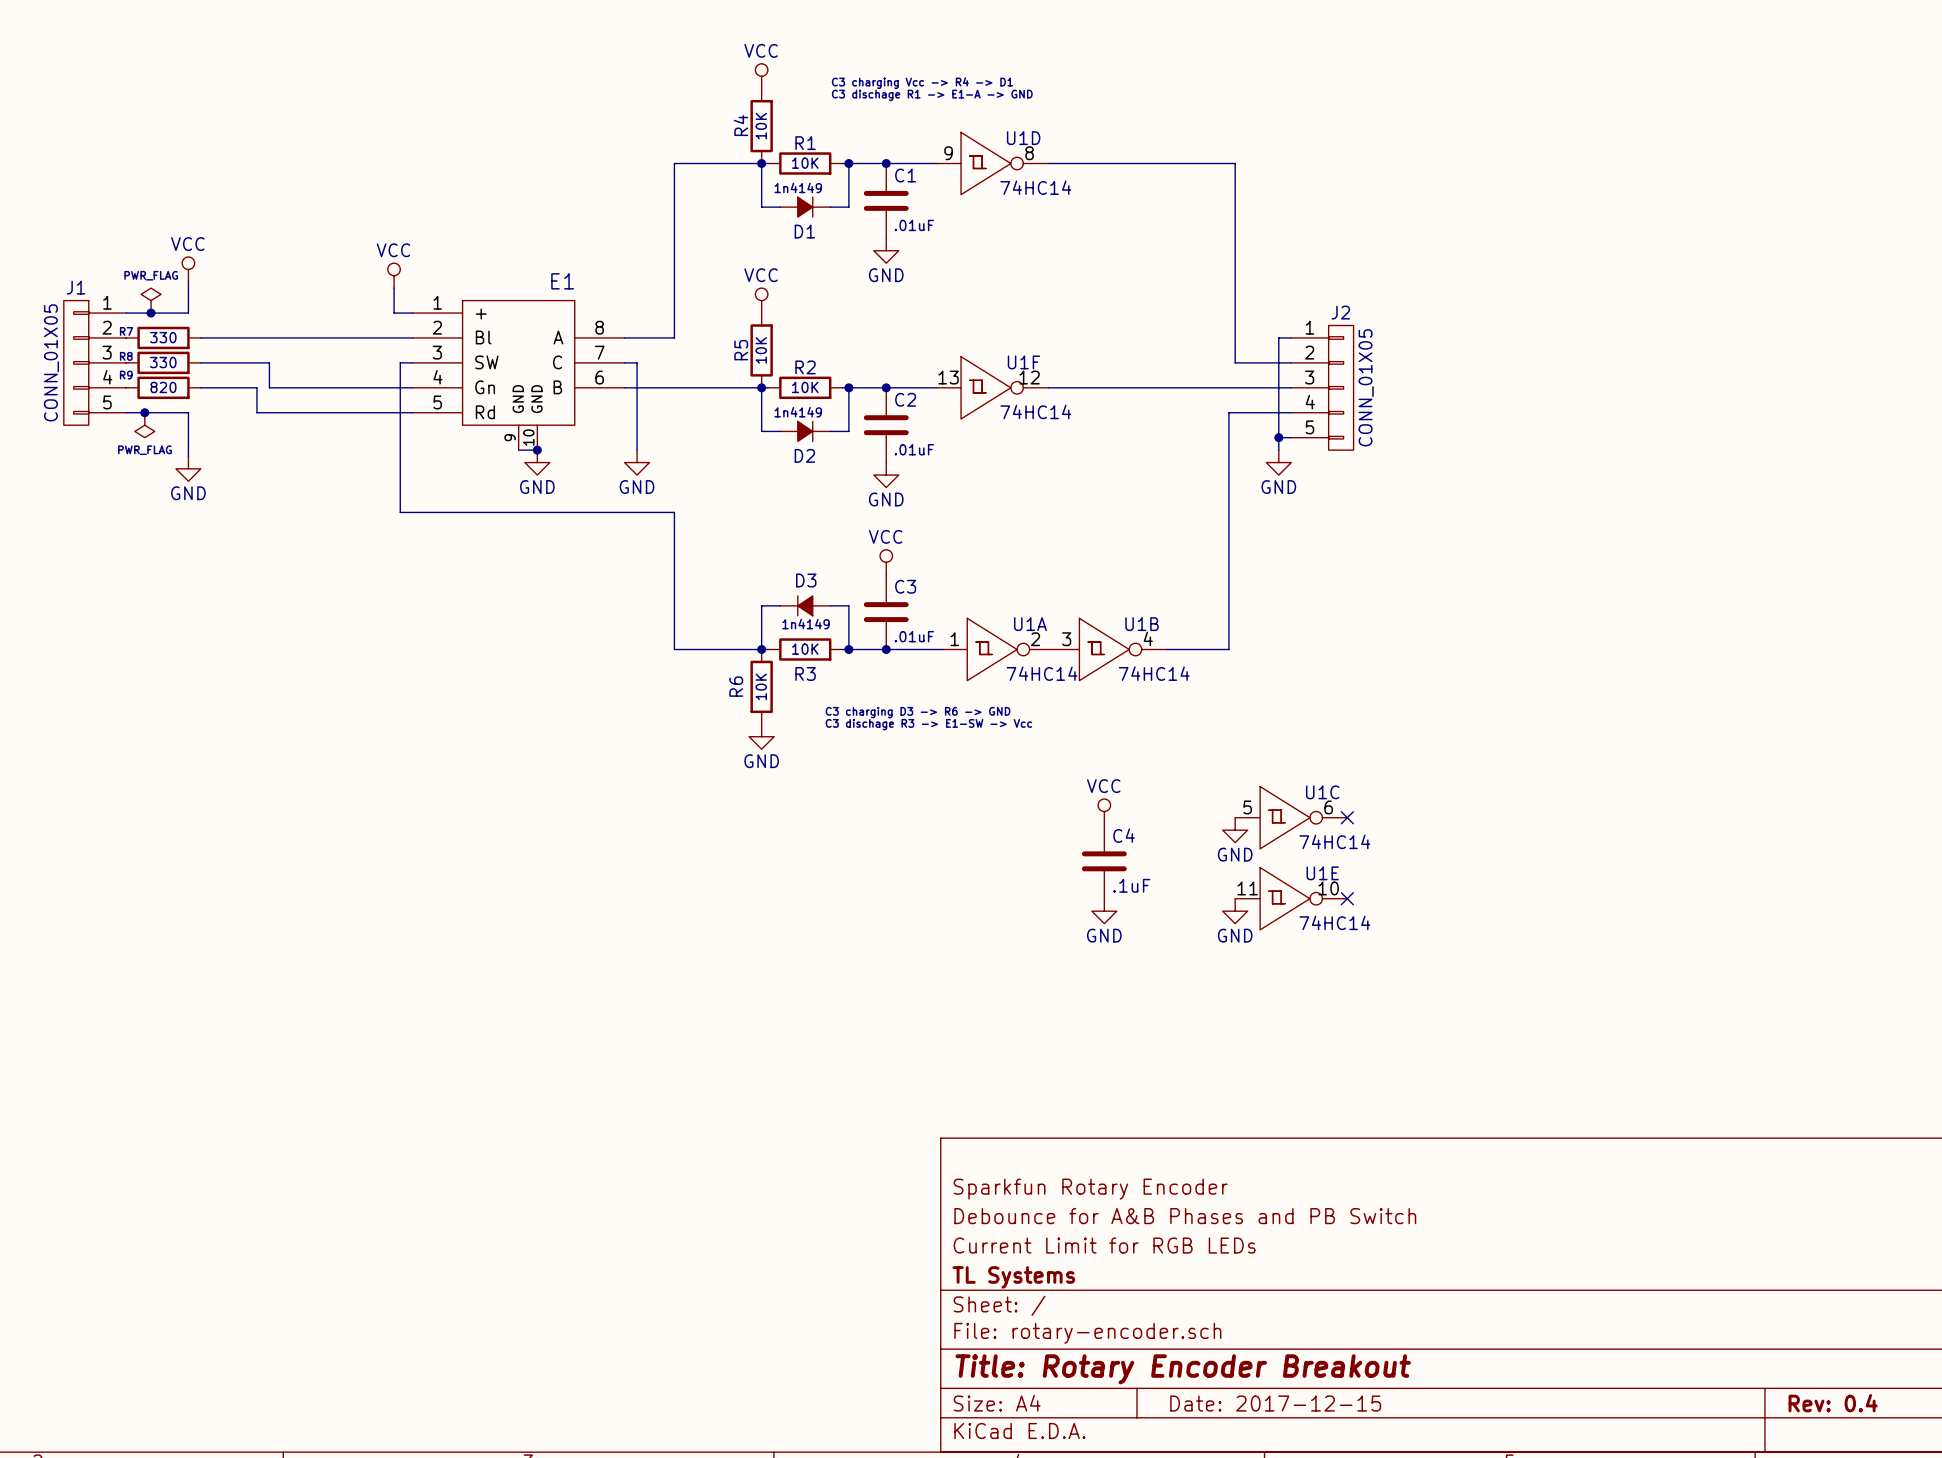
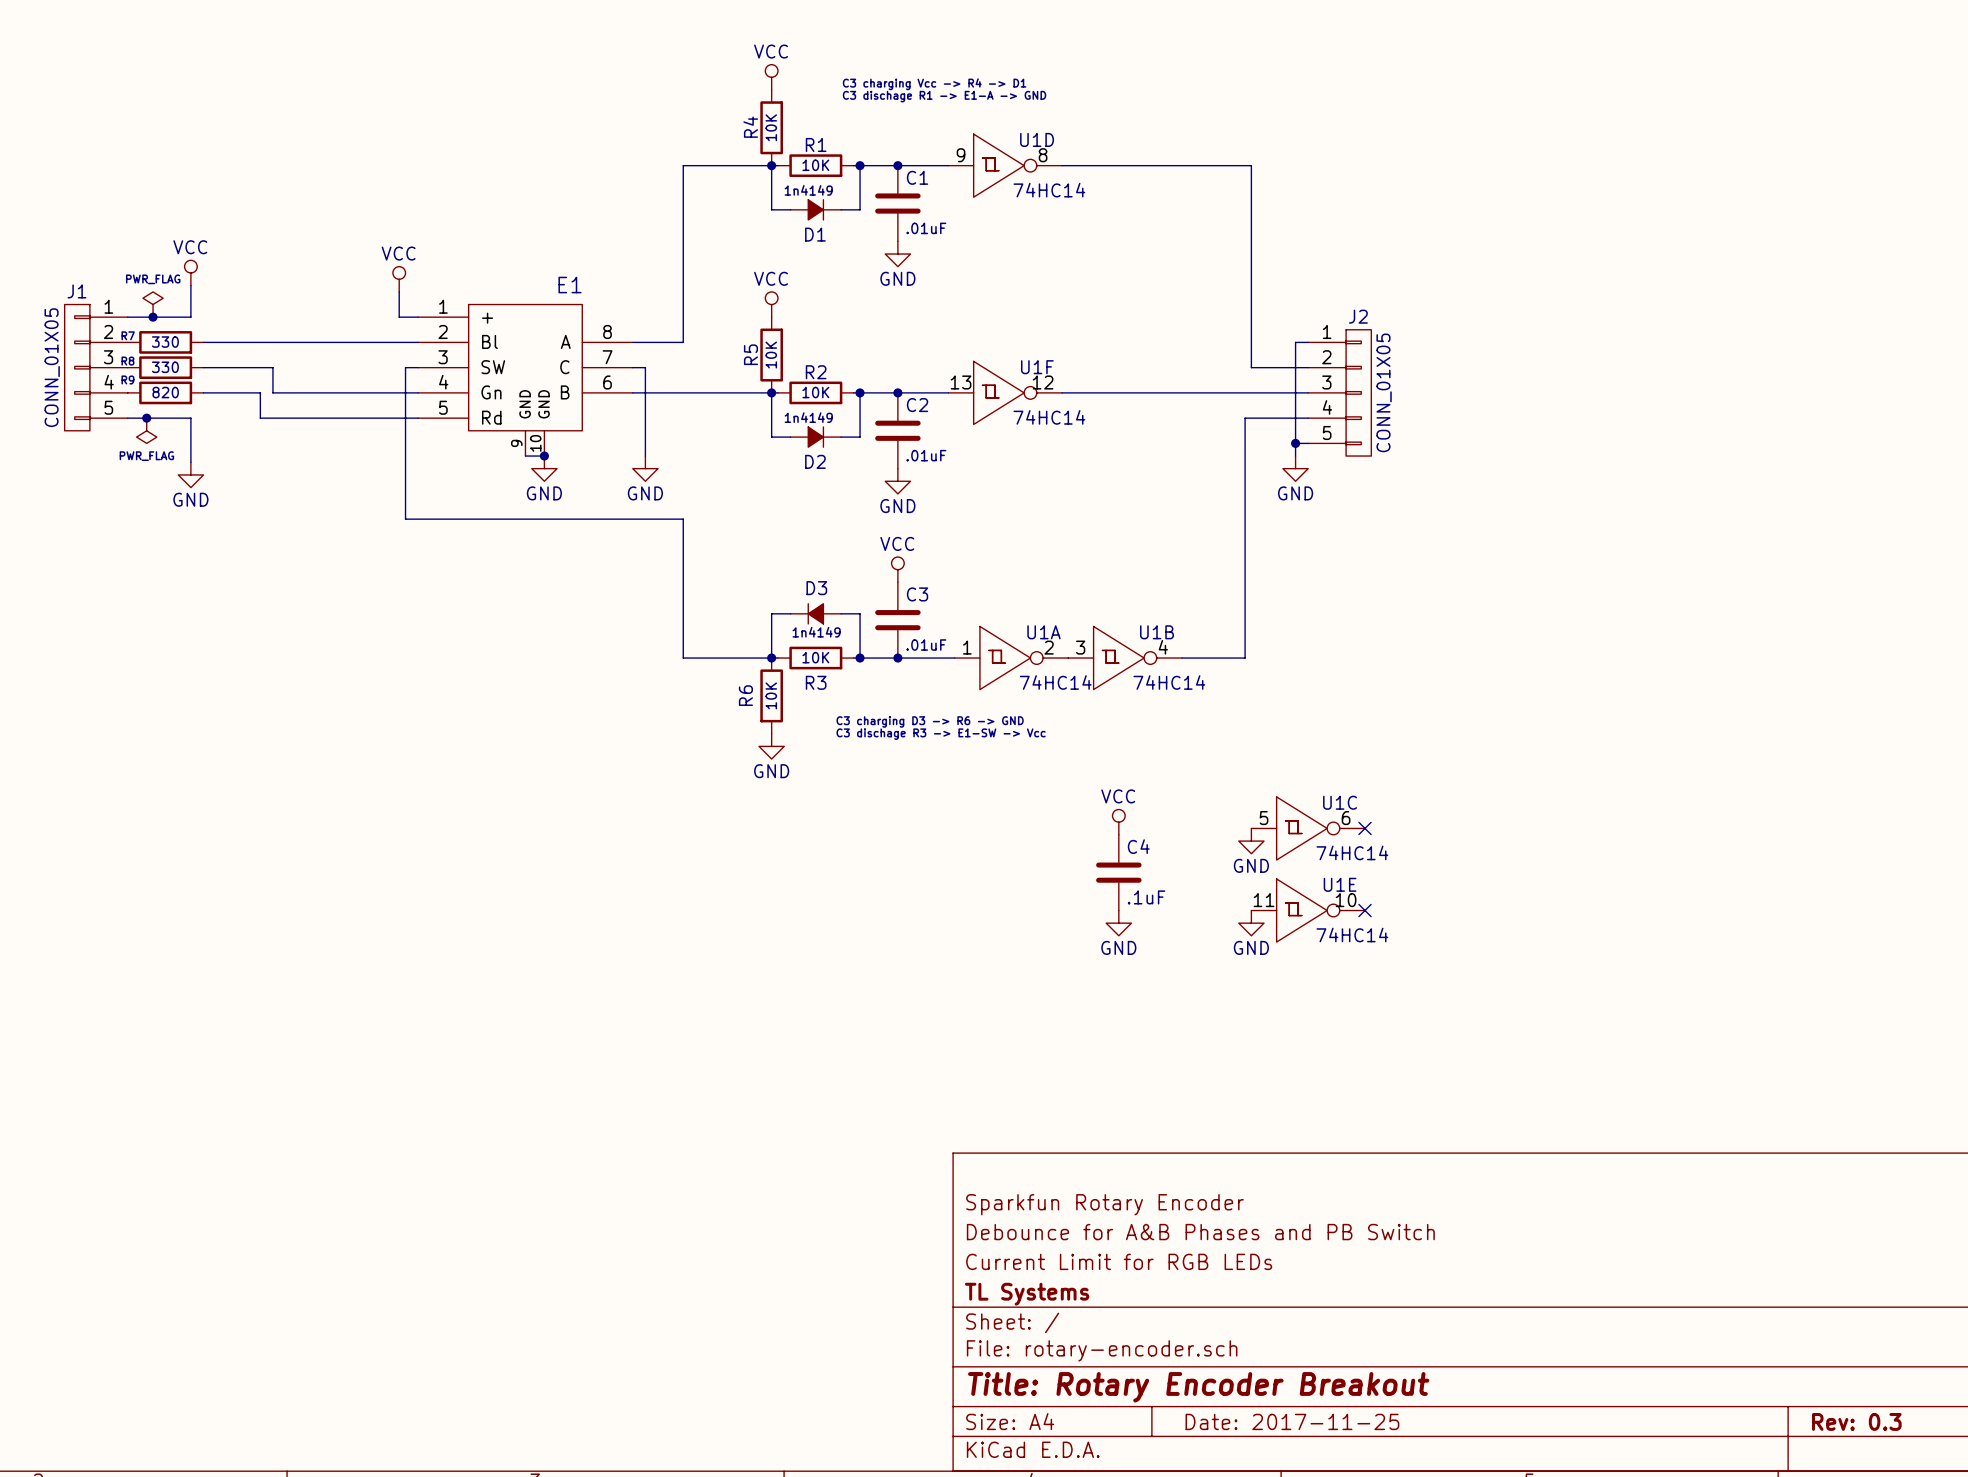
title block: Date: 2017-12-15 (1275, 1403) -> Date: 2017-11-25 (1292, 1421)
title block: Rev: 0.4 (1833, 1403) -> Rev: 0.3 (1856, 1421)

